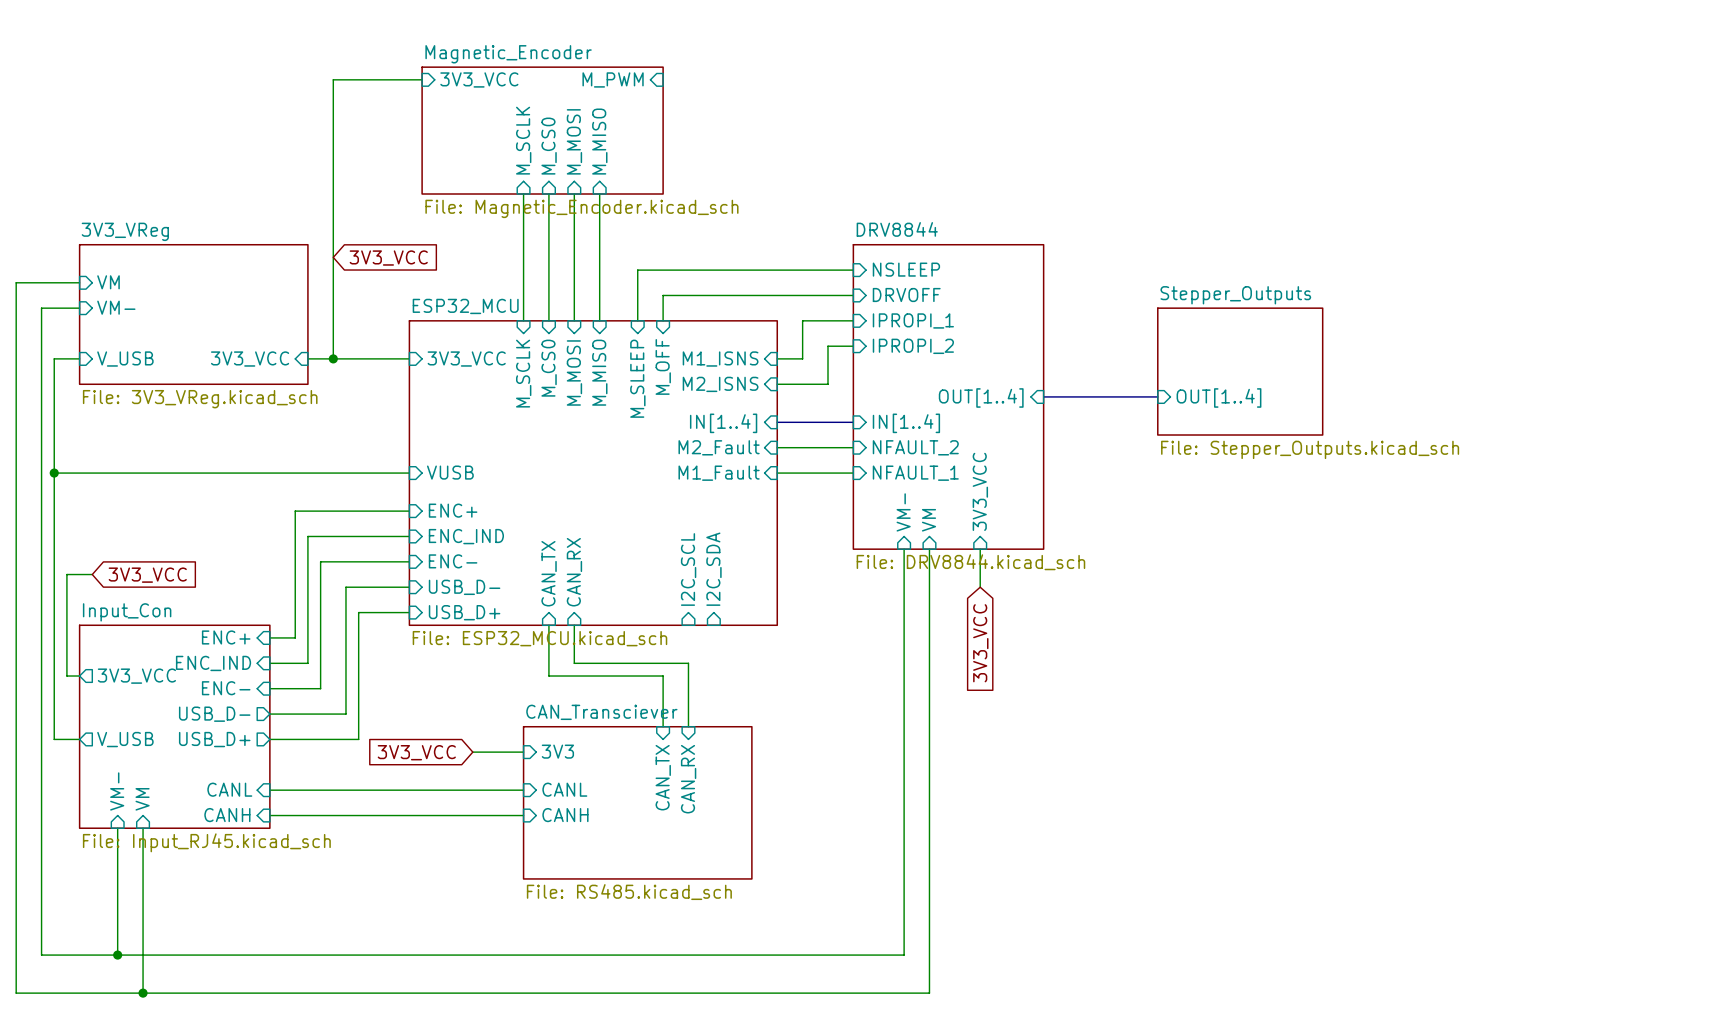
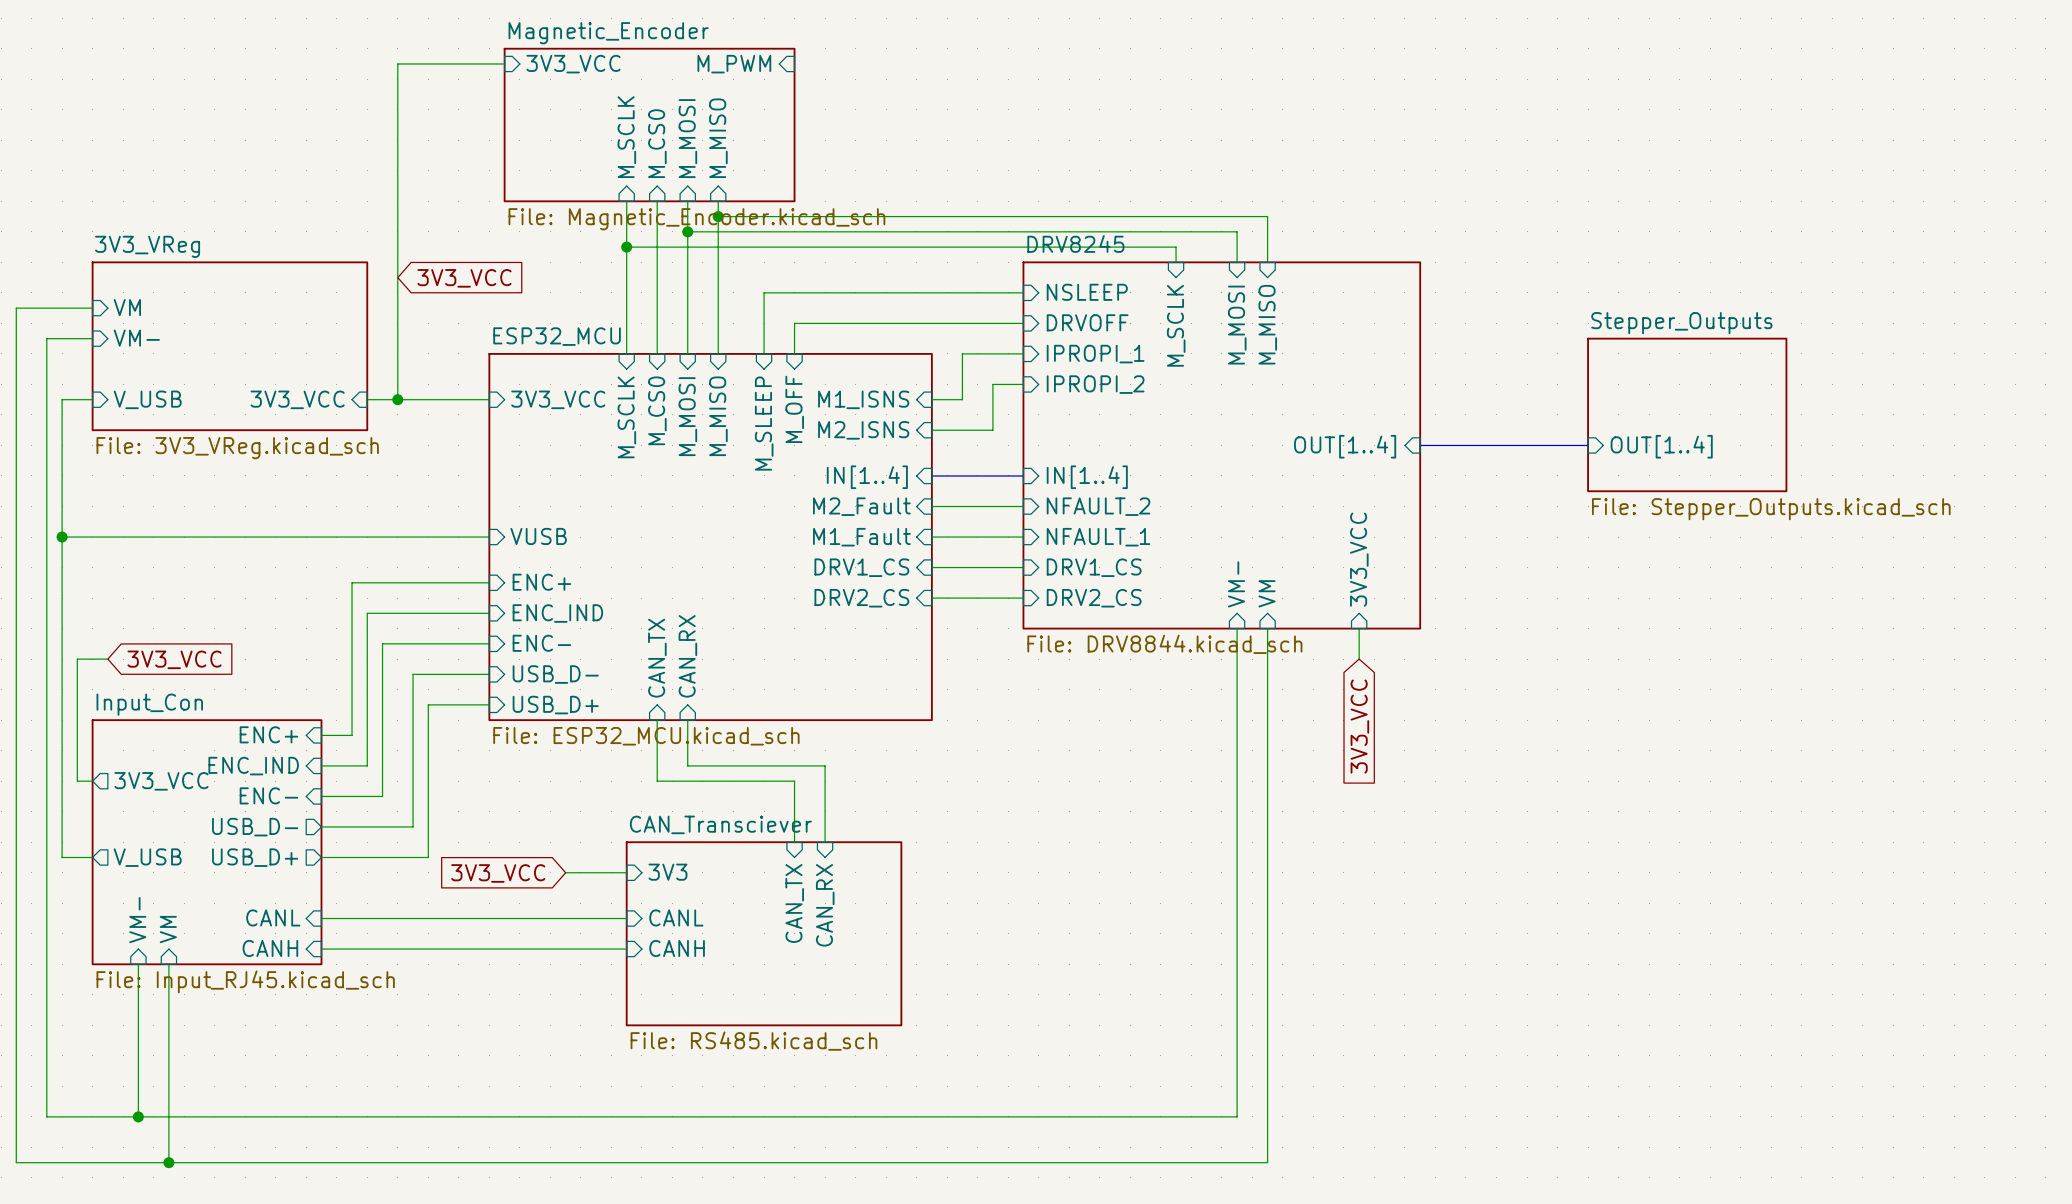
wire: none -> (718, 216) (1267, 216) (1267, 262)
junction: none -> (718, 216)
wire: none -> (687, 231) (1237, 231) (1237, 262)
junction: none -> (687, 231)
wire: none -> (626, 247) (1176, 247) (1176, 262)
junction: none -> (626, 247)
sheet pin: none -> M_MOSI (1237, 325)
sheet pin: none -> M_MISO (1267, 324)
sheet pin: none -> M_SCLK (1176, 325)
sheet Stepper_Outputs position: (1240, 371) -> (1687, 414)
sheet DRV8844: File: DRV8844.kicad_sch (948, 396) -> none
sheet DRV8245: none -> File: DRV8844.kicad_sch (1221, 445)
bus: (1043, 396) (1157, 396) -> none
bus: none -> (1420, 445) (1588, 445)
sheet pin: OUT[1..4] (981, 397) -> none
sheet pin rotation: 0° (1218, 397) -> 180° (1345, 446)
sheet pin position: OUT[1..4] (1218, 397) -> OUT[1..4] (1345, 446)
sheet pin: none -> OUT[1..4] (1661, 446)
sheet pin position: 3V3_VCC (980, 491) -> 3V3_VCC (1359, 559)
sheet pin: none -> DRV1_CS (861, 567)
wire: none -> (931, 567) (1023, 567)
sheet pin: none -> DRV1_CS (1094, 567)
sheet pin position: VM- (903, 512) -> VM- (1236, 584)
sheet pin position: VM (929, 520) -> VM (1267, 593)
sheet pin: none -> DRV2_CS (861, 598)
wire: none -> (931, 598) (1023, 598)
sheet pin: none -> DRV2_CS (1094, 598)
wire: (904, 549) (904, 955) -> (1237, 628) (1237, 1116) (1084, 1116)
wire: (929, 549) (929, 993) -> (1267, 628) (1267, 1162) (1115, 1162)
wire: (980, 549) (980, 587) -> none
wire: none -> (1359, 628) (1359, 659)
sheet pin: I2C_SCL (688, 569) -> none
sheet pin: I2C_SDA (713, 569) -> none
global label position: 3V3_VCC (980, 643) -> 3V3_VCC (1359, 726)

